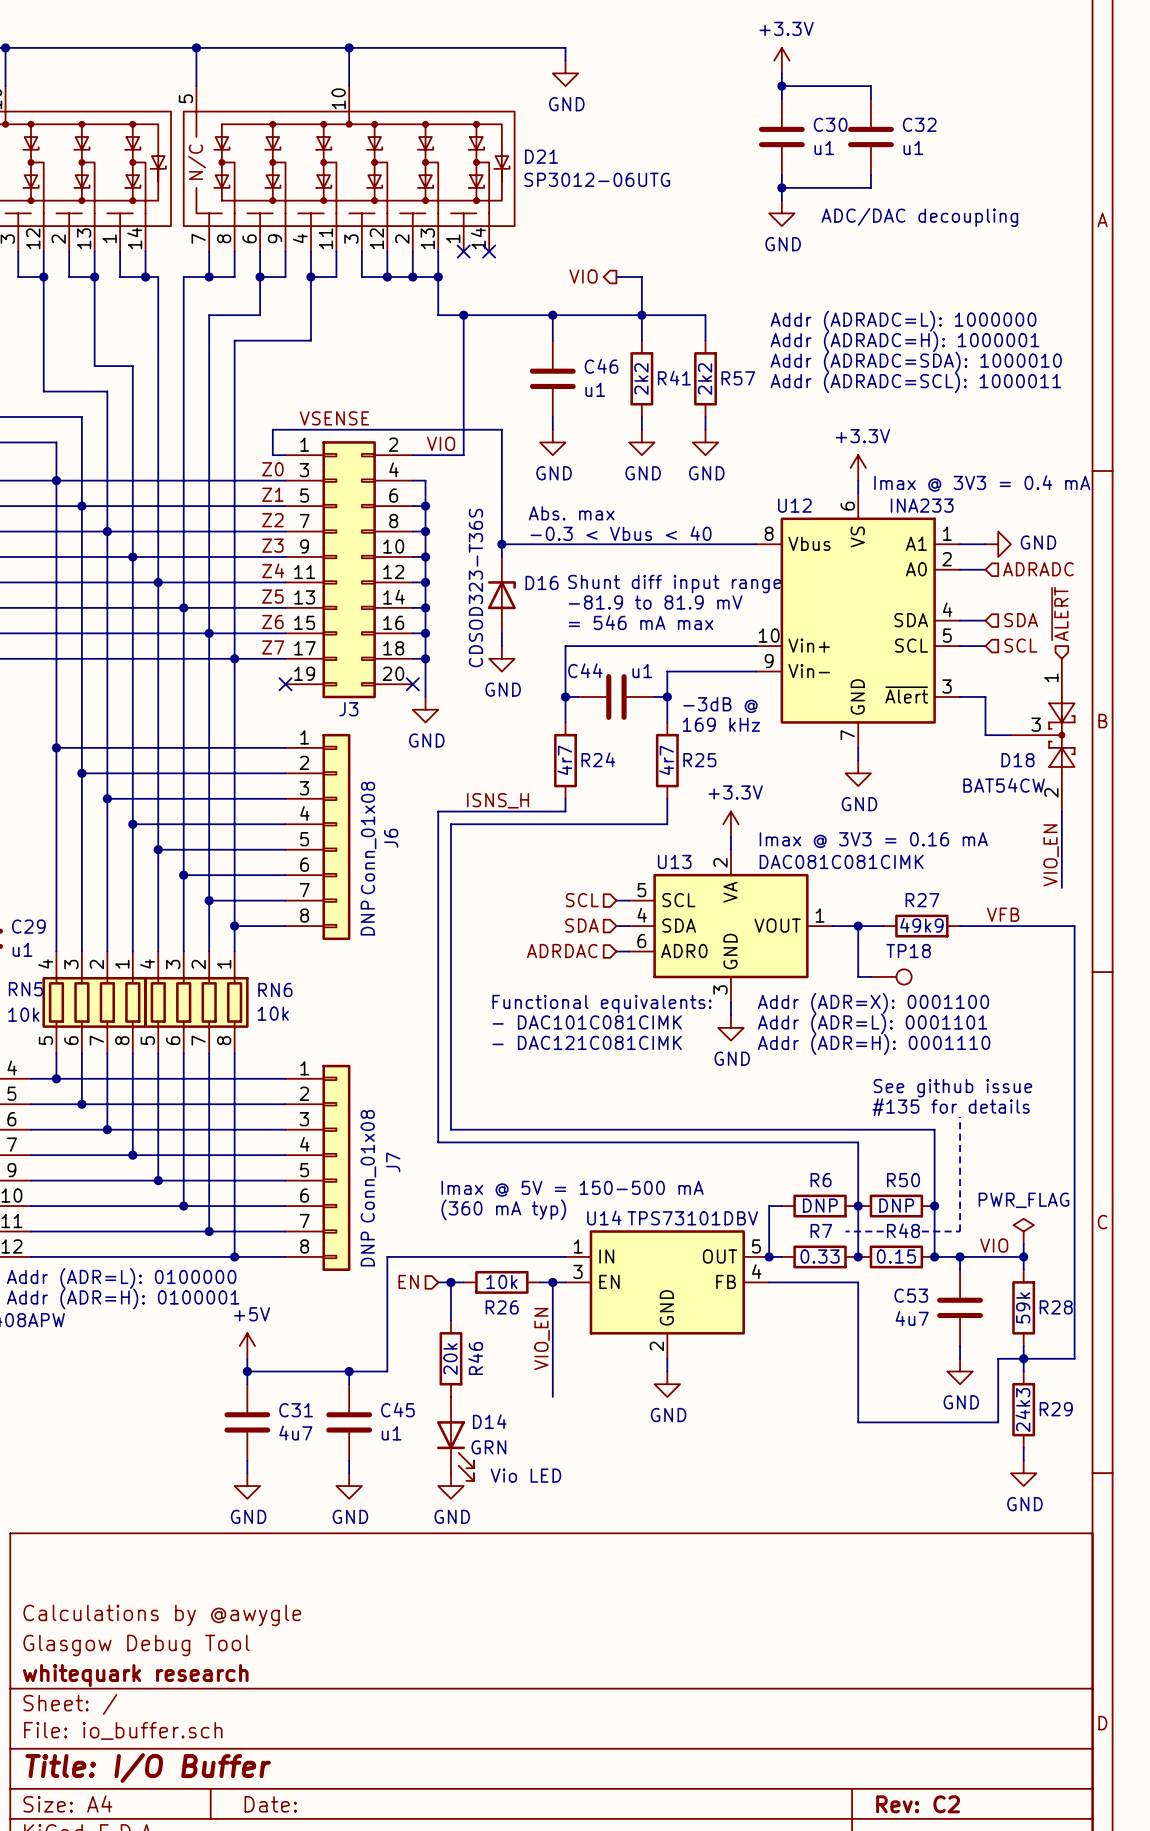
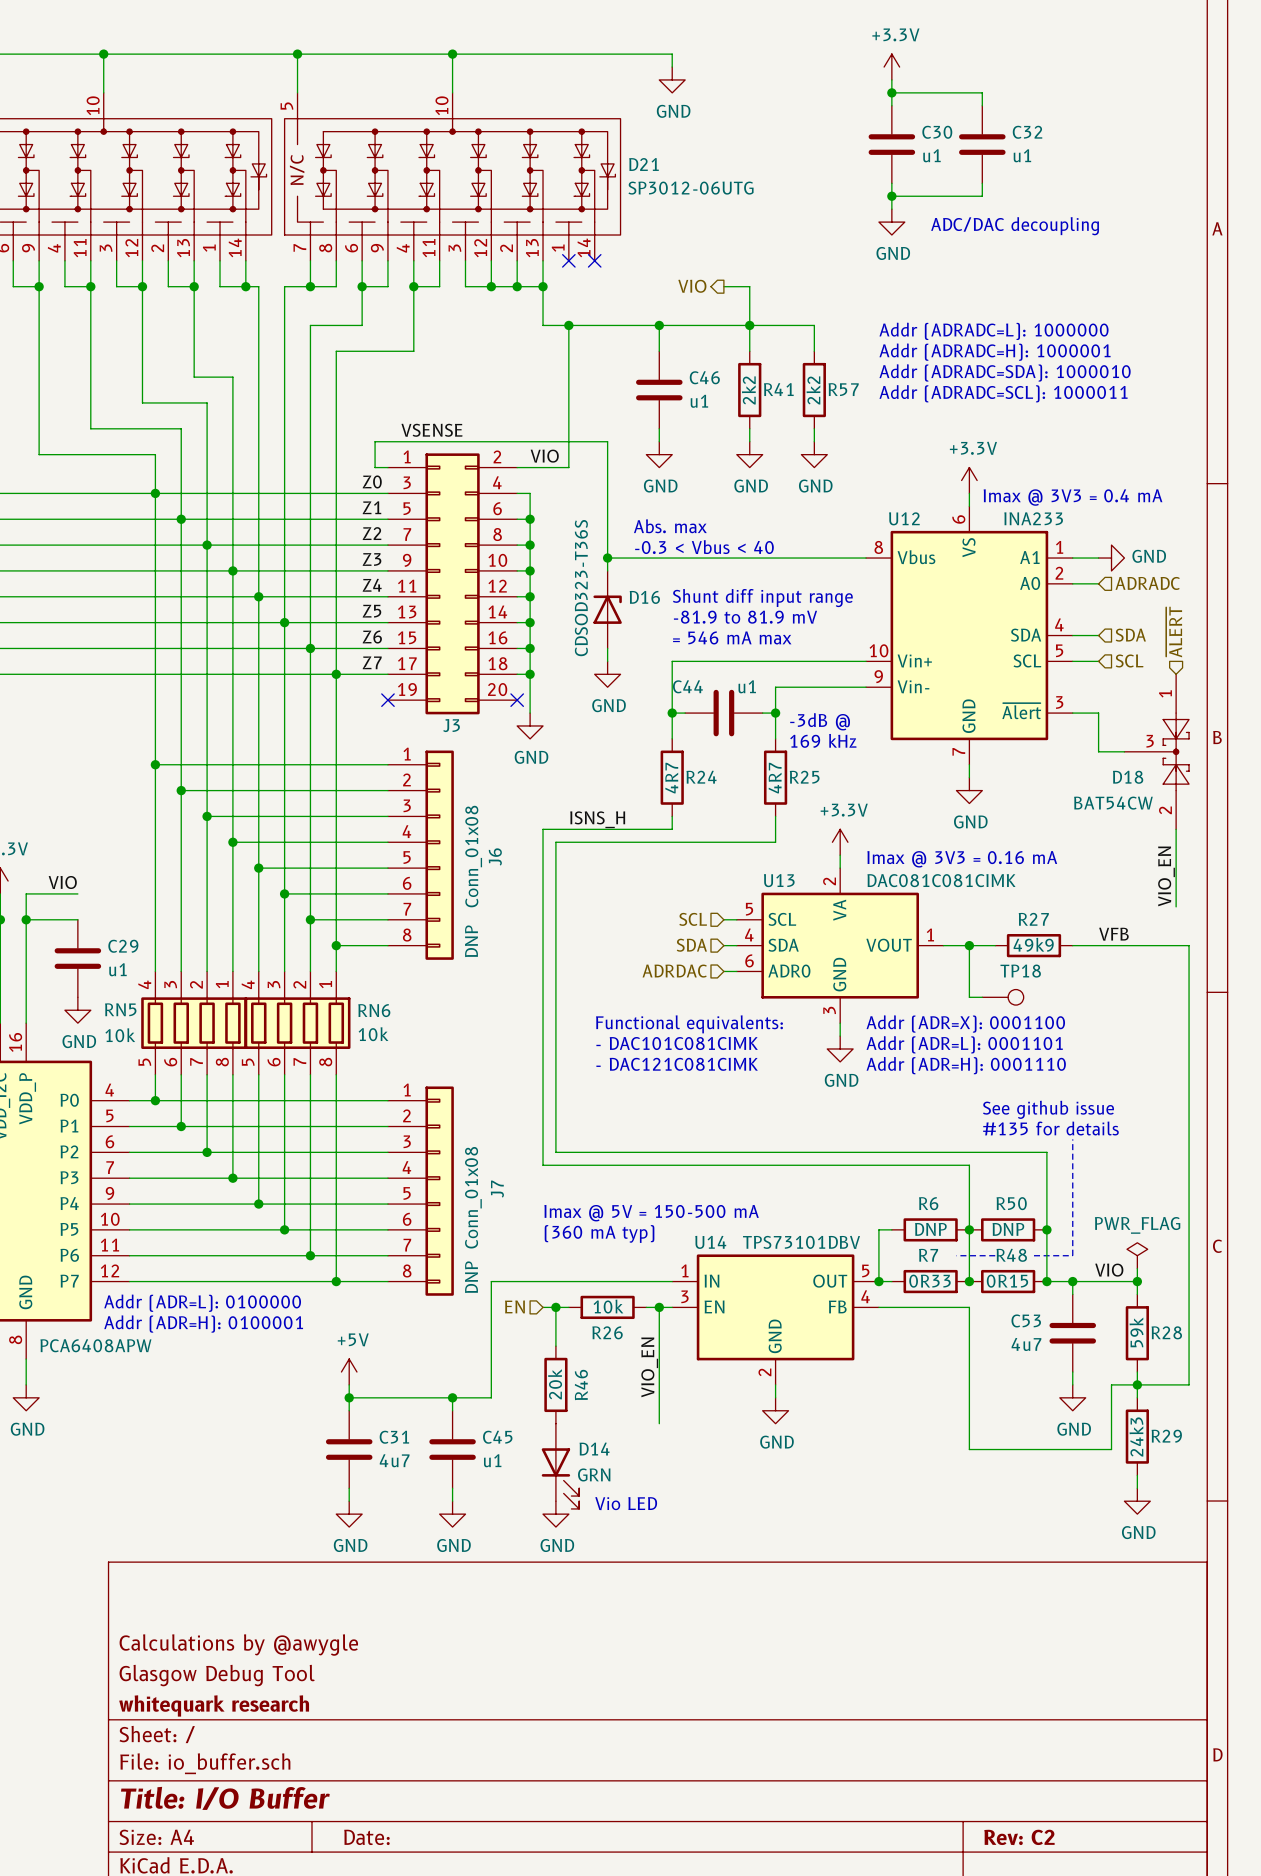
R24 value: 4r7 (564, 760) -> 4R7 (671, 778)
R25 value: 4r7 (666, 760) -> 4R7 (775, 778)
R7 value: 0.33 (820, 1256) -> 0R33 (929, 1281)
R48 value: 0.15 (896, 1256) -> 0R15 (1007, 1281)

